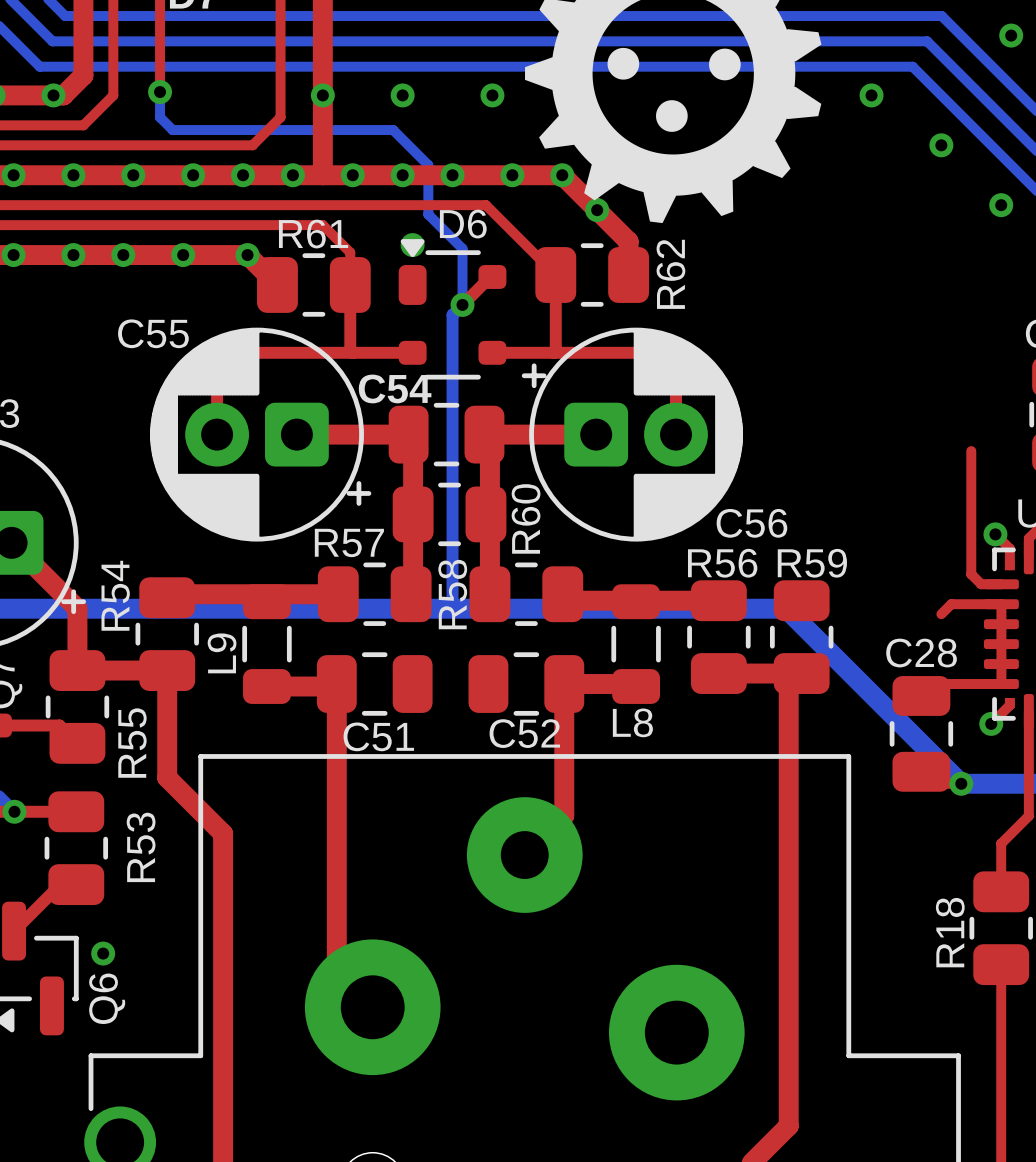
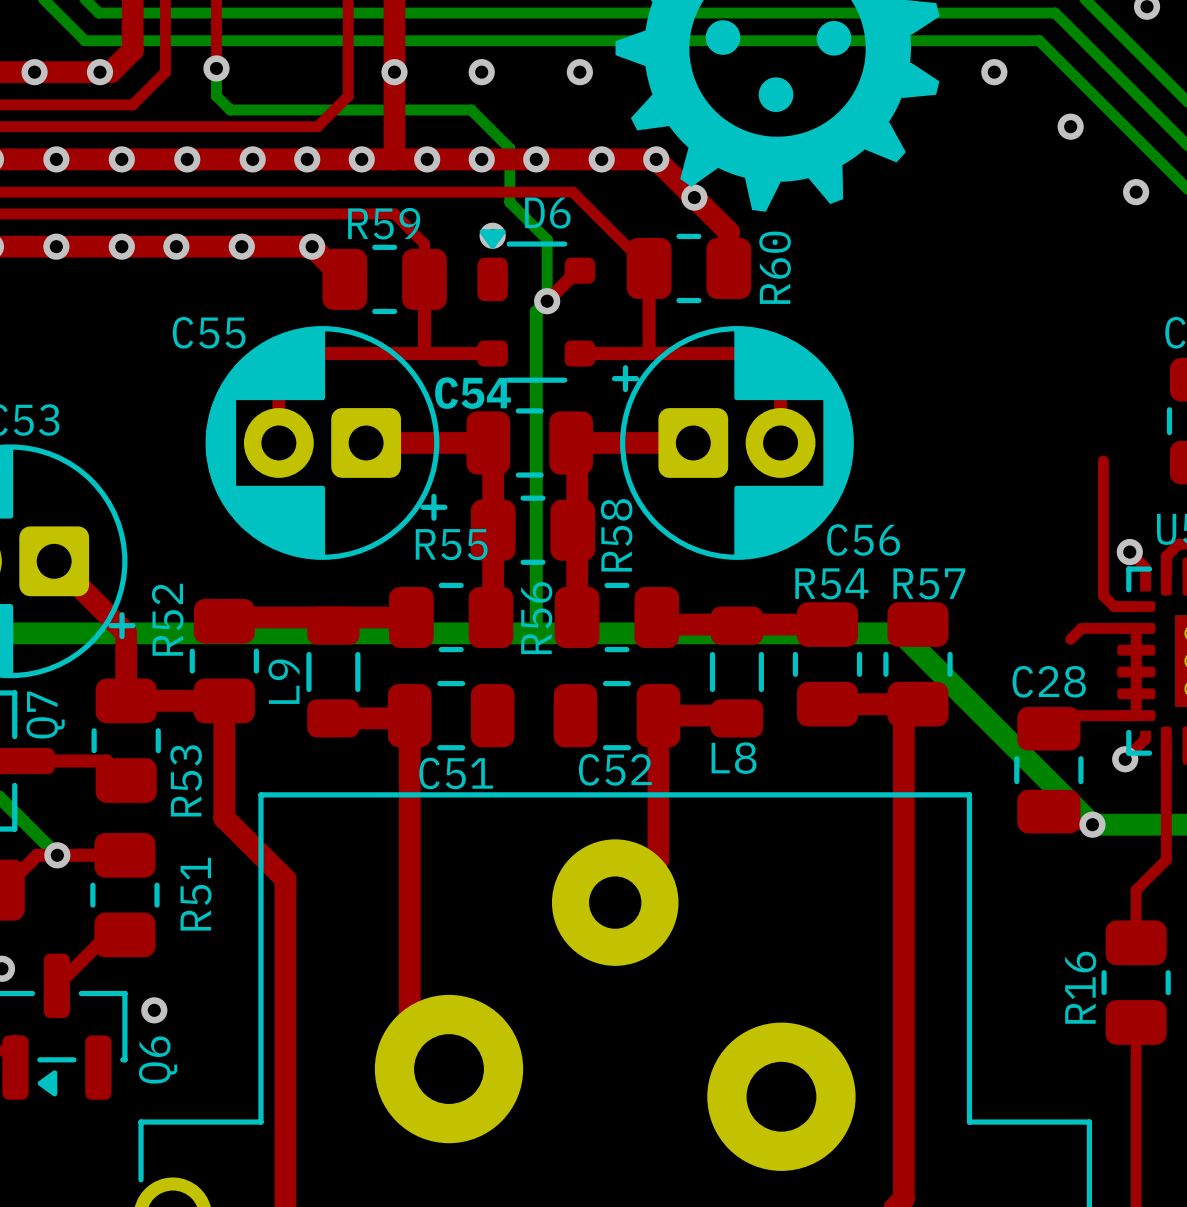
R61 name: R61 (313, 234) -> R59 (384, 223)
R62 name: R62 (670, 274) -> R60 (775, 267)
R60 name: R60 (526, 518) -> R58 (616, 535)
R57 name: R57 (349, 542) -> R55 (451, 544)
R56 name: R56 (722, 563) -> R54 (831, 583)
R59 name: R59 (812, 563) -> R57 (929, 583)
R58 name: R58 (452, 594) -> R56 (536, 618)
R54 name: R54 (115, 595) -> R52 (167, 619)
R55 name: R55 (132, 743) -> R53 (186, 780)
R53 name: R53 (141, 847) -> R51 (196, 894)
R18 name: R18 (950, 932) -> R16 (1080, 987)

